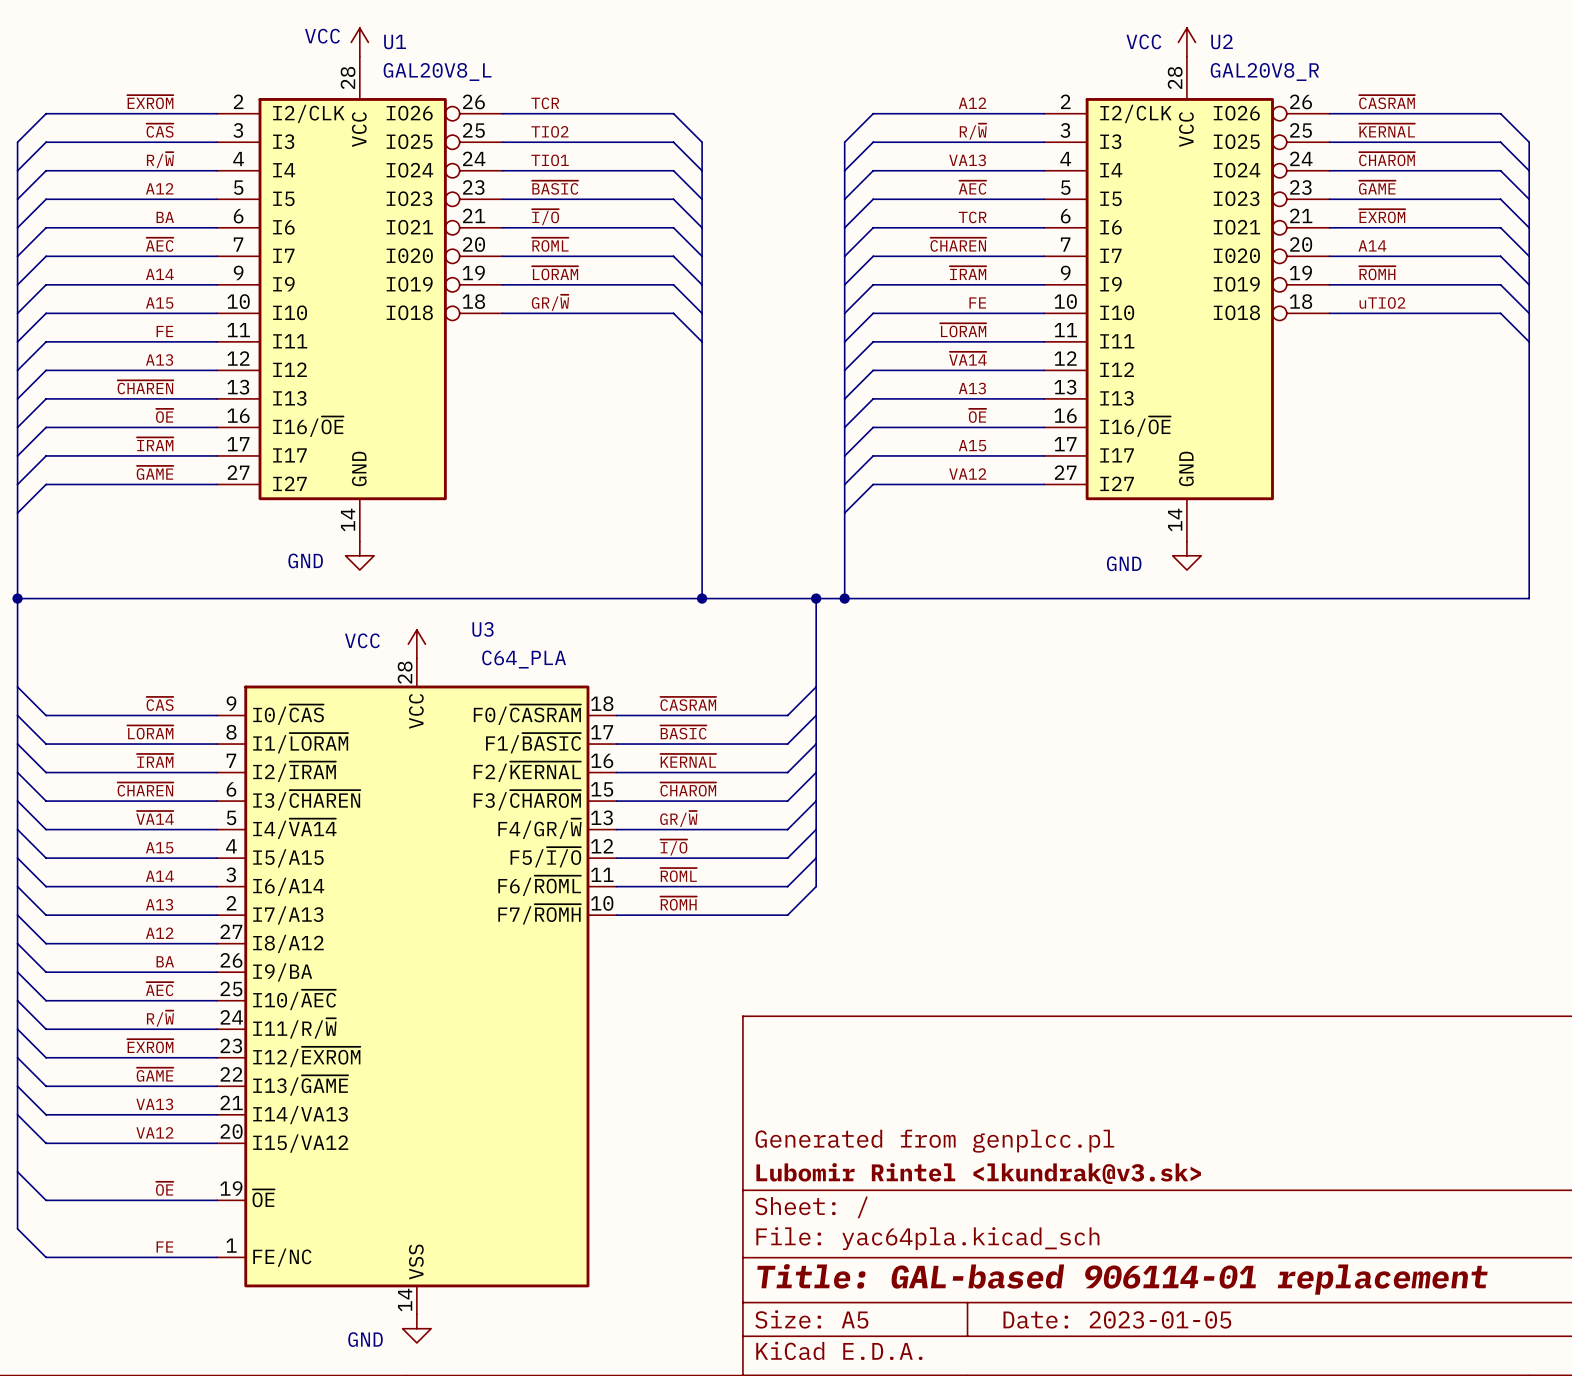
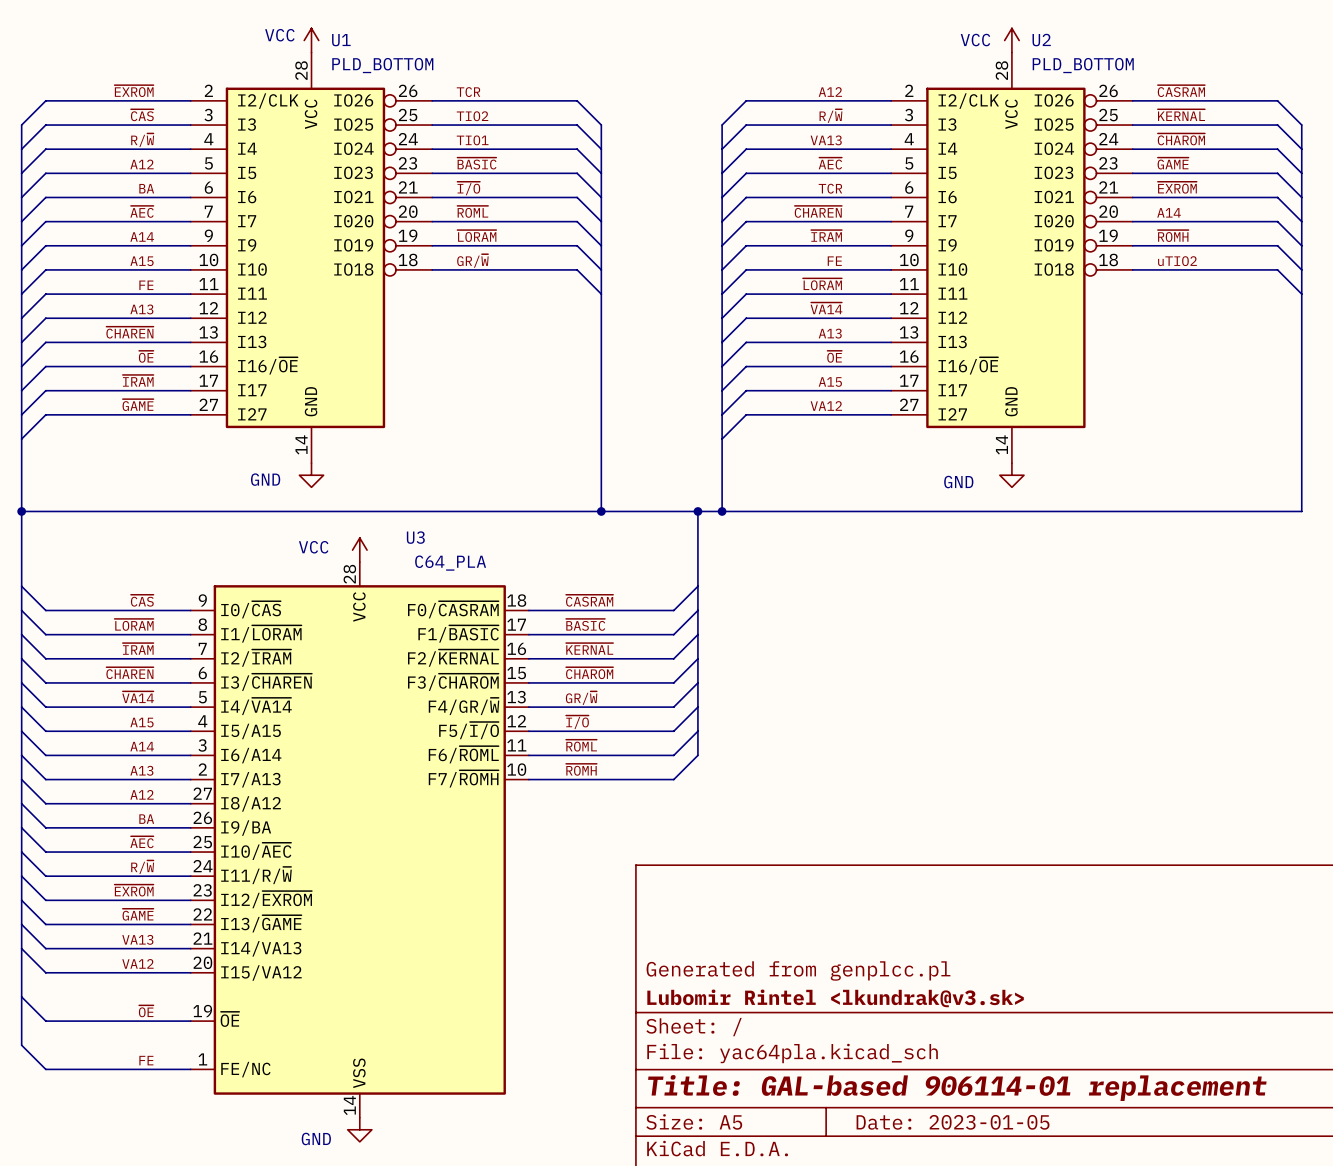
U1 value: GAL20V8_L (437, 72) -> PLD_BOTTOM (382, 65)
U2 value: GAL20V8_R (1264, 72) -> PLD_BOTTOM (1083, 65)

